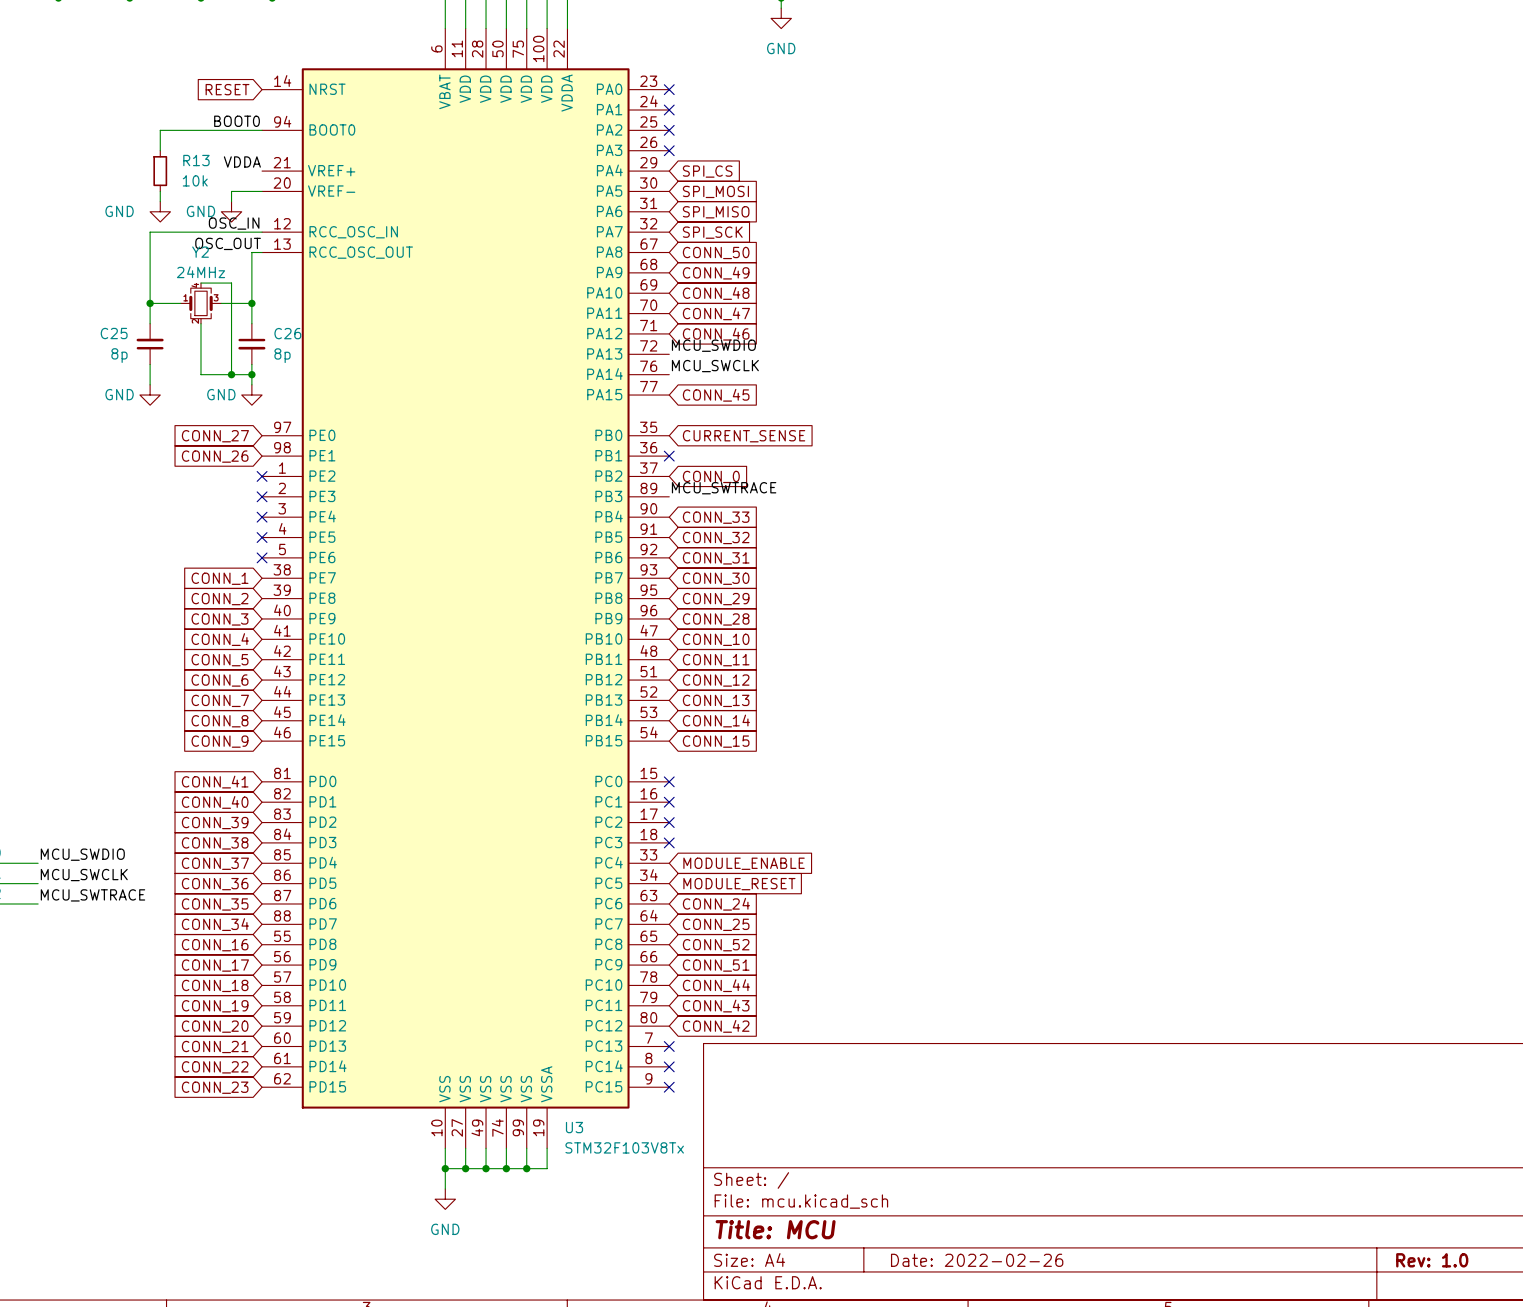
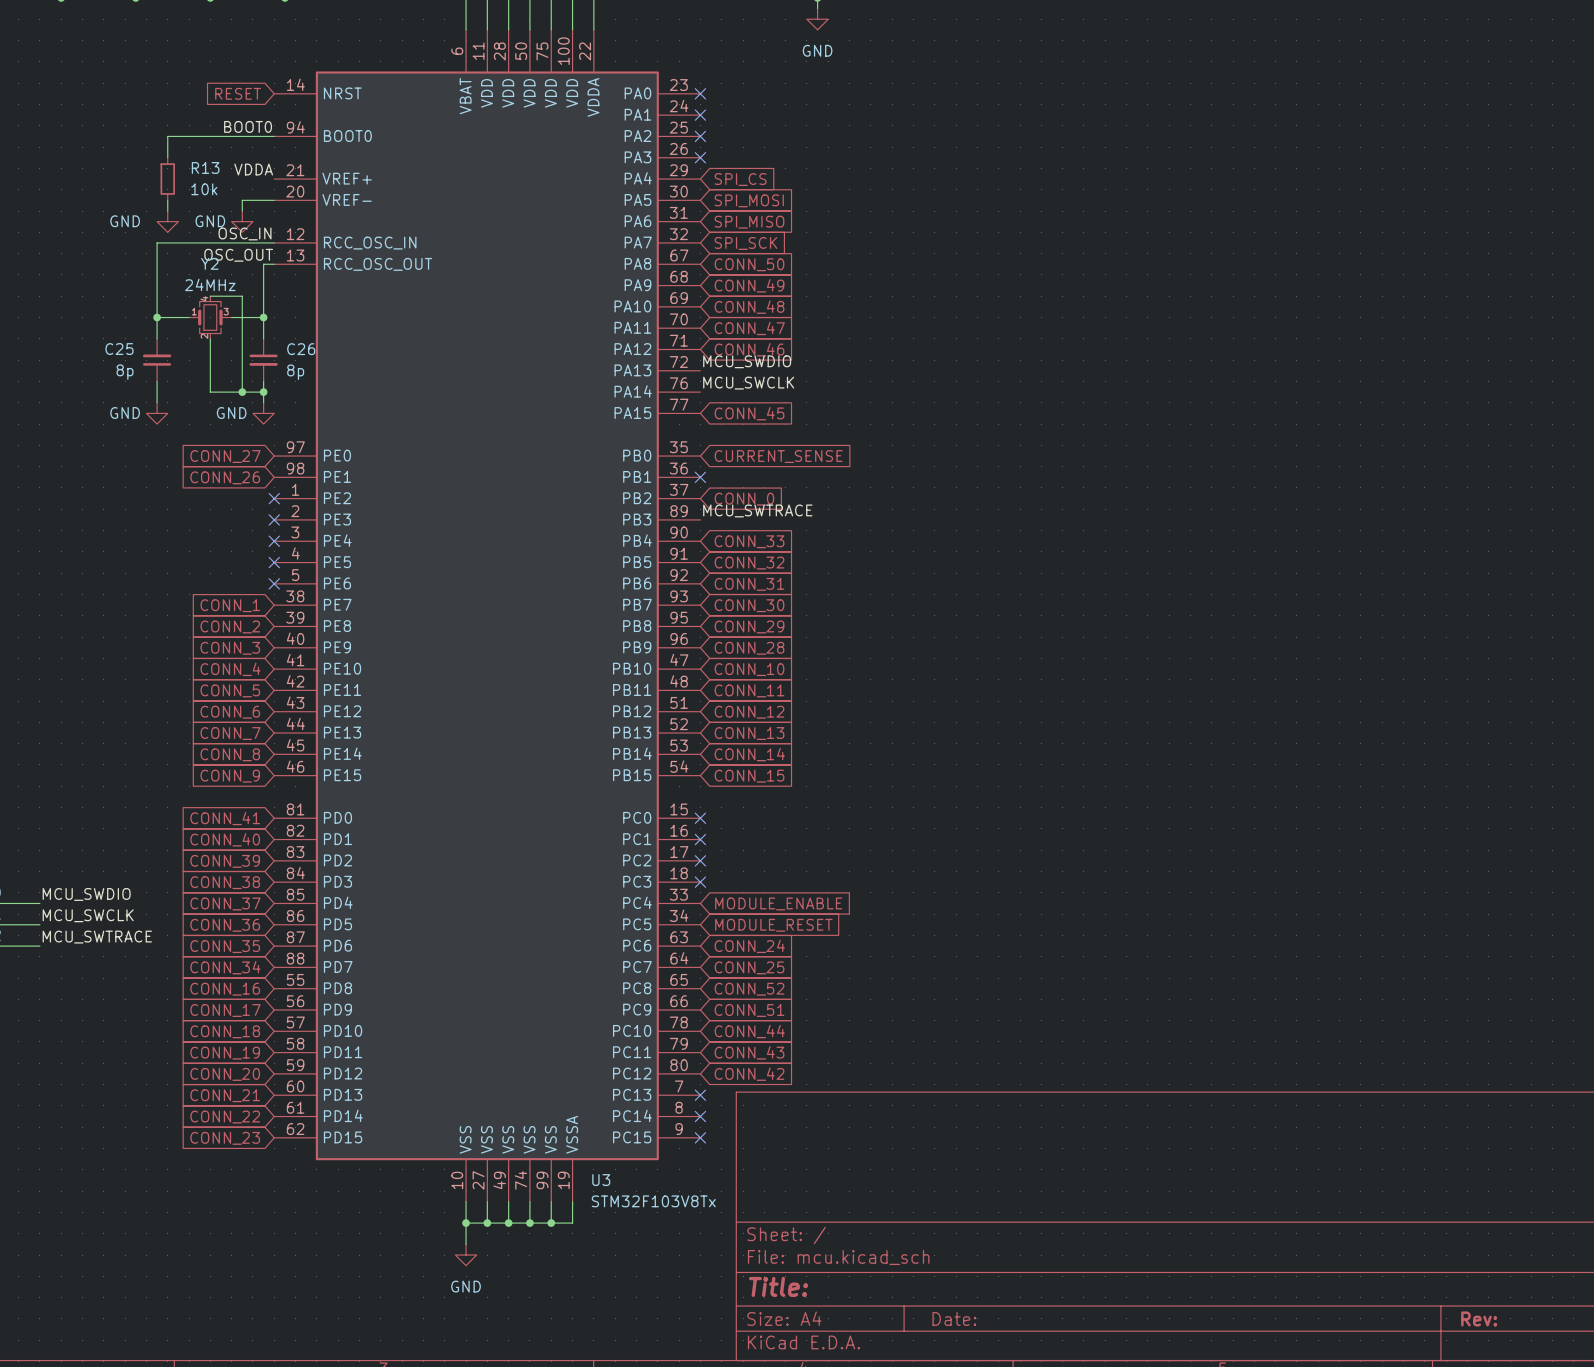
title block: Title: MCU (775, 1229) -> Title: (778, 1286)
title block: Date: 2022-02-26 (977, 1260) -> Date: (954, 1318)
title block: Rev: 1.0 (1432, 1260) -> Rev: (1479, 1318)

